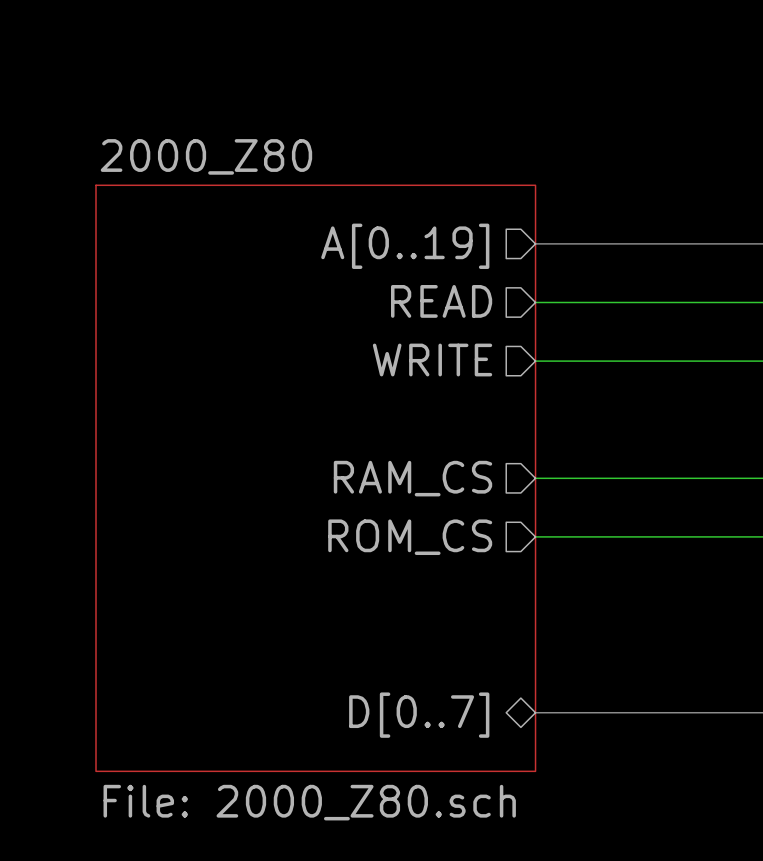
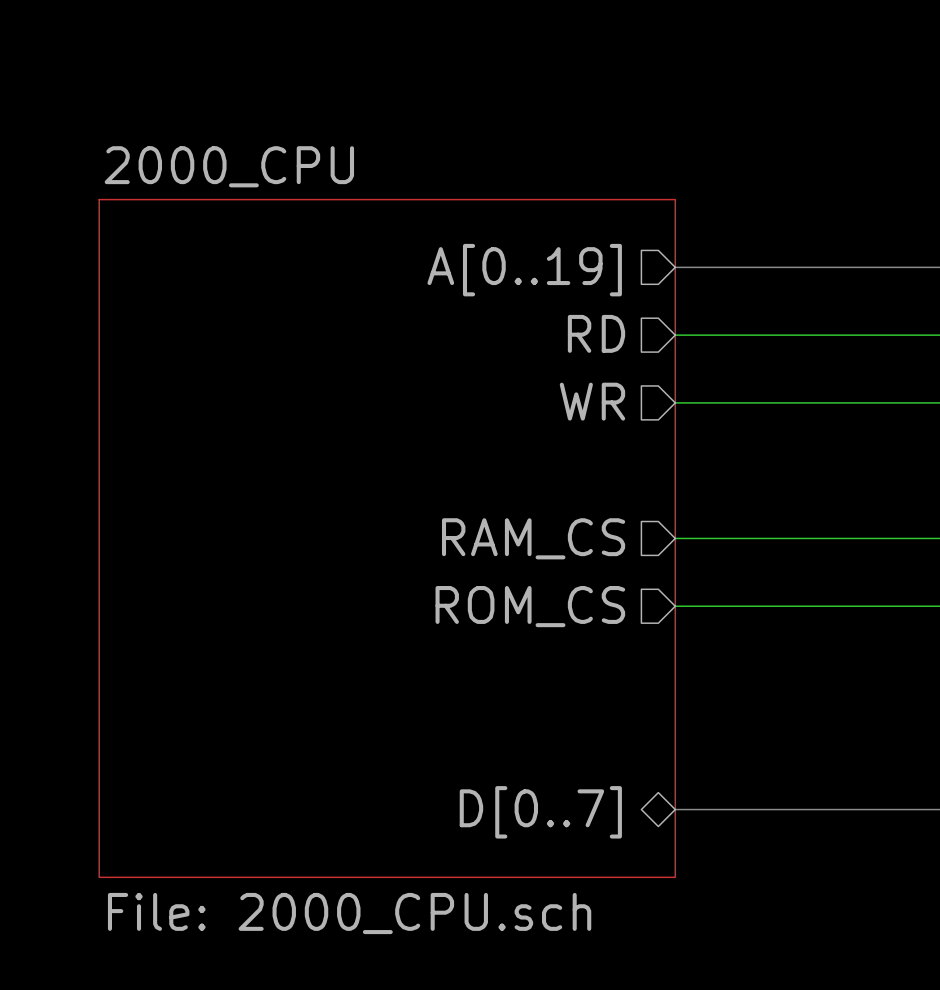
sheet pin: READ (441, 301) -> RD (596, 333)
sheet pin: WRITE (432, 360) -> WR (592, 401)
sheet 2000_CPU: none -> File: 2000_CPU.sch (387, 538)
sheet 2000_Z80: File: 2000_Z80.sch (315, 478) -> none

